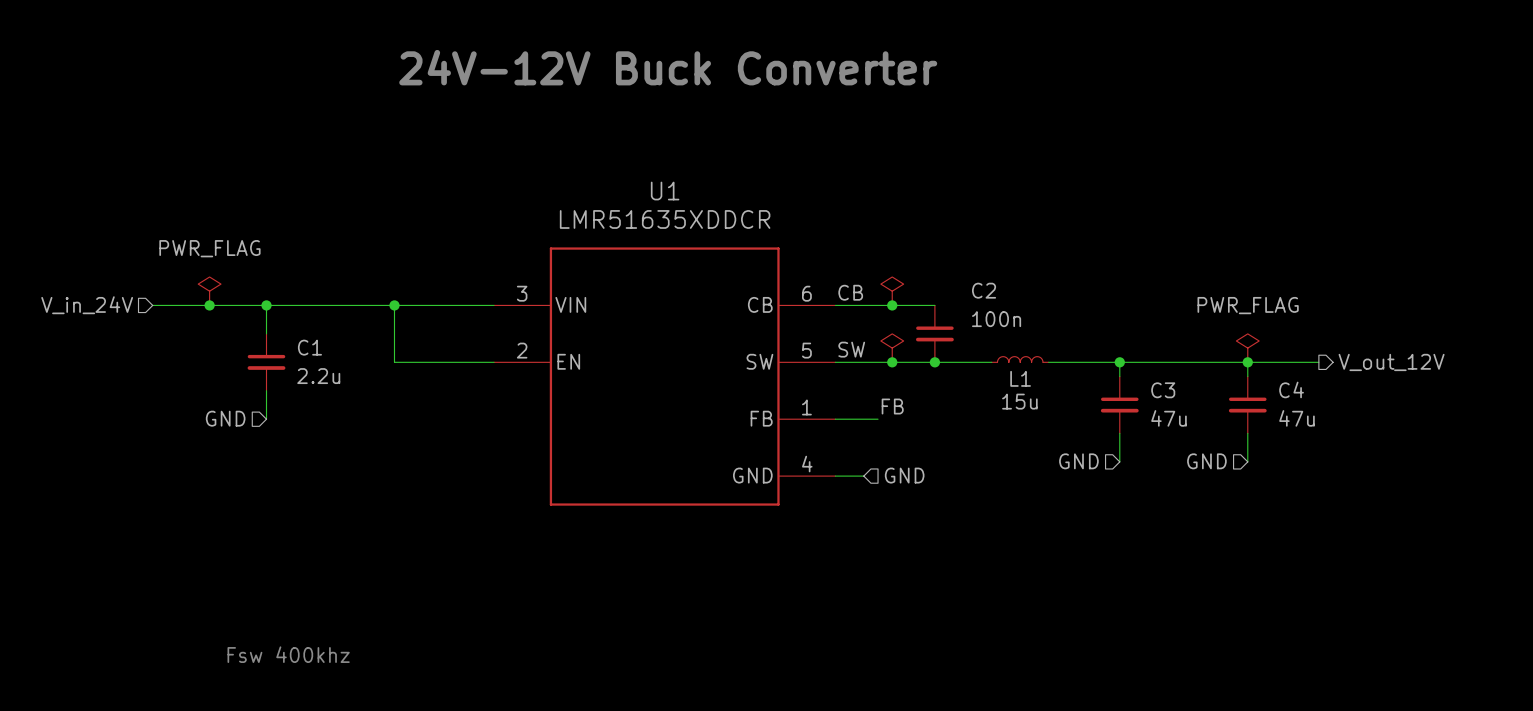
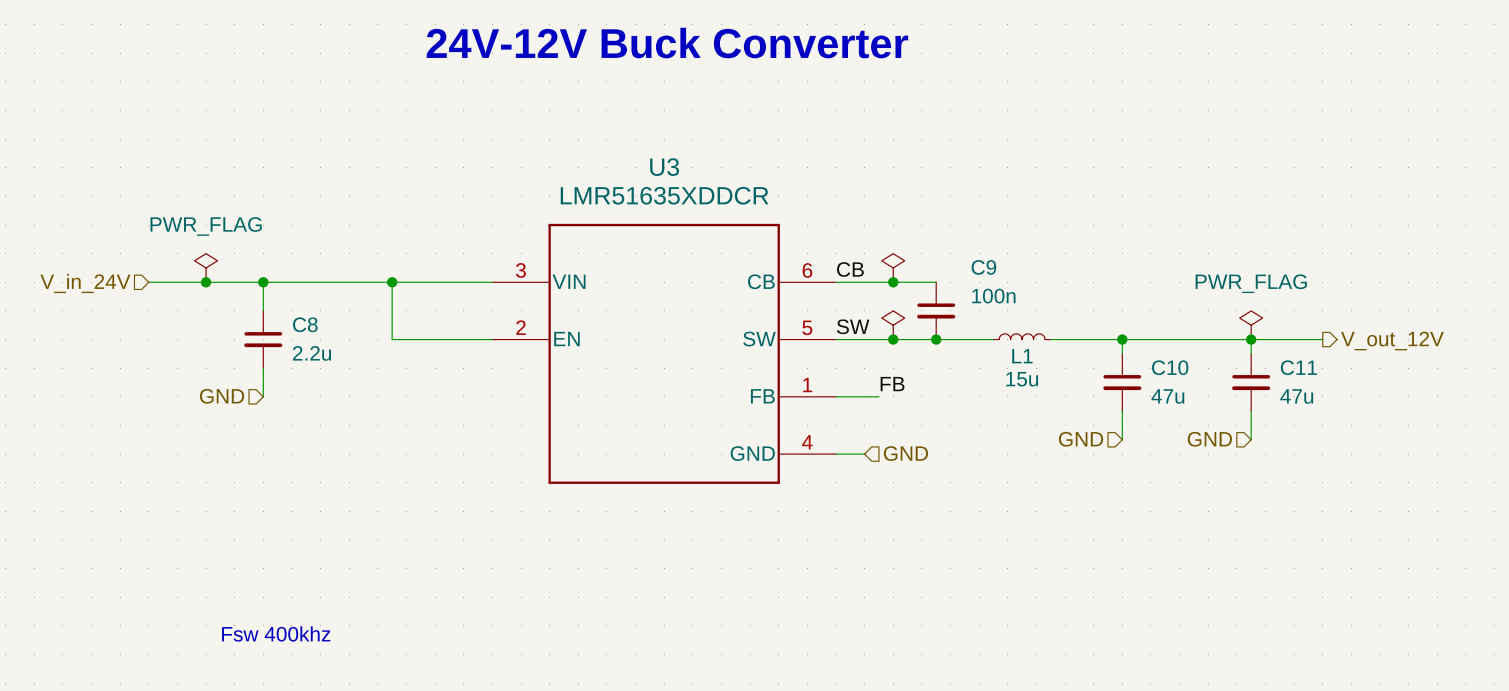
U1 name: U1 (665, 191) -> U3 (664, 167)
C2 name: C2 (984, 290) -> C9 (983, 267)
C1 name: C1 (309, 347) -> C8 (305, 324)
C4 name: C4 (1291, 389) -> C11 (1298, 367)
C3 name: C3 (1163, 390) -> C10 (1170, 367)

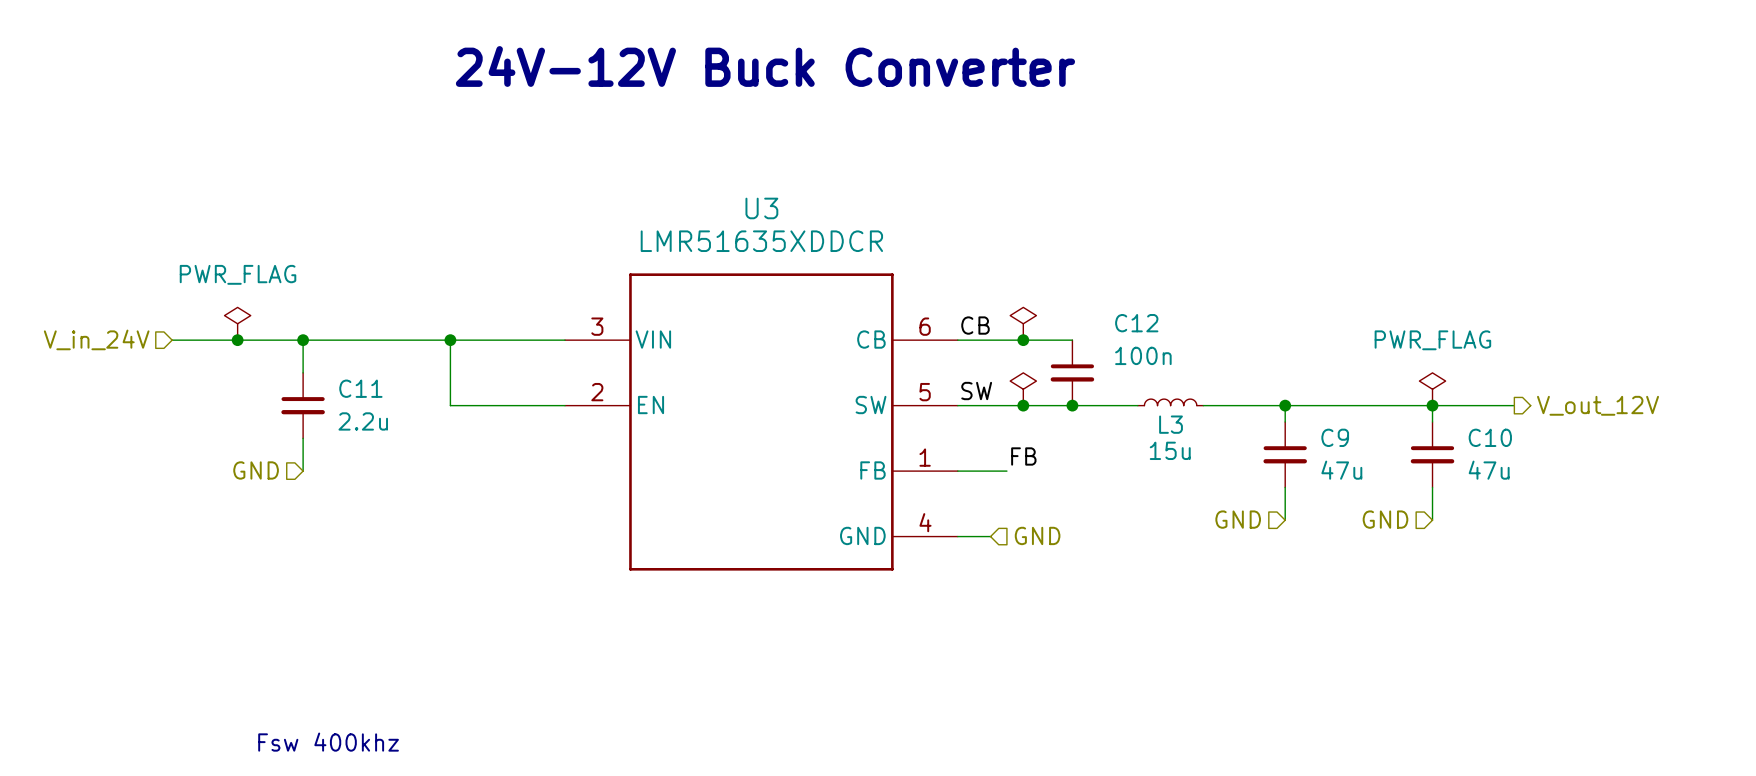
C9 name: C9 (983, 267) -> C12 (1136, 323)
C8 name: C8 (305, 324) -> C11 (360, 388)
L1 name: L1 (1022, 356) -> L3 (1171, 424)
C10 name: C10 (1170, 367) -> C9 (1335, 437)
C11 name: C11 (1298, 367) -> C10 (1490, 437)

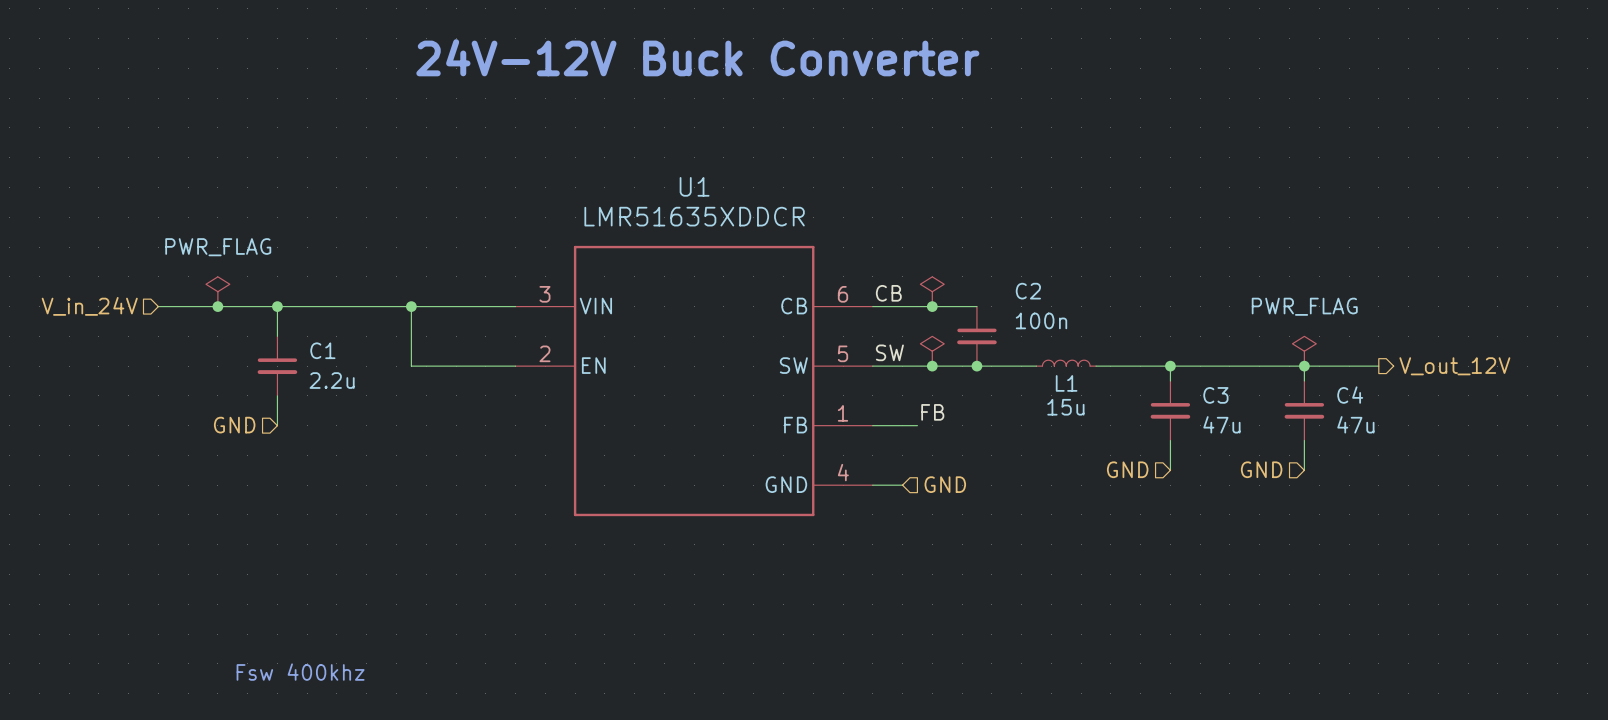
U3 name: U3 (761, 208) -> U1 (694, 186)
C12 name: C12 (1136, 323) -> C2 (1028, 291)
C11 name: C11 (360, 388) -> C1 (322, 350)
L3 name: L3 (1171, 424) -> L1 (1066, 383)
C9 name: C9 (1335, 437) -> C3 (1215, 395)
C10 name: C10 (1490, 437) -> C4 (1350, 395)

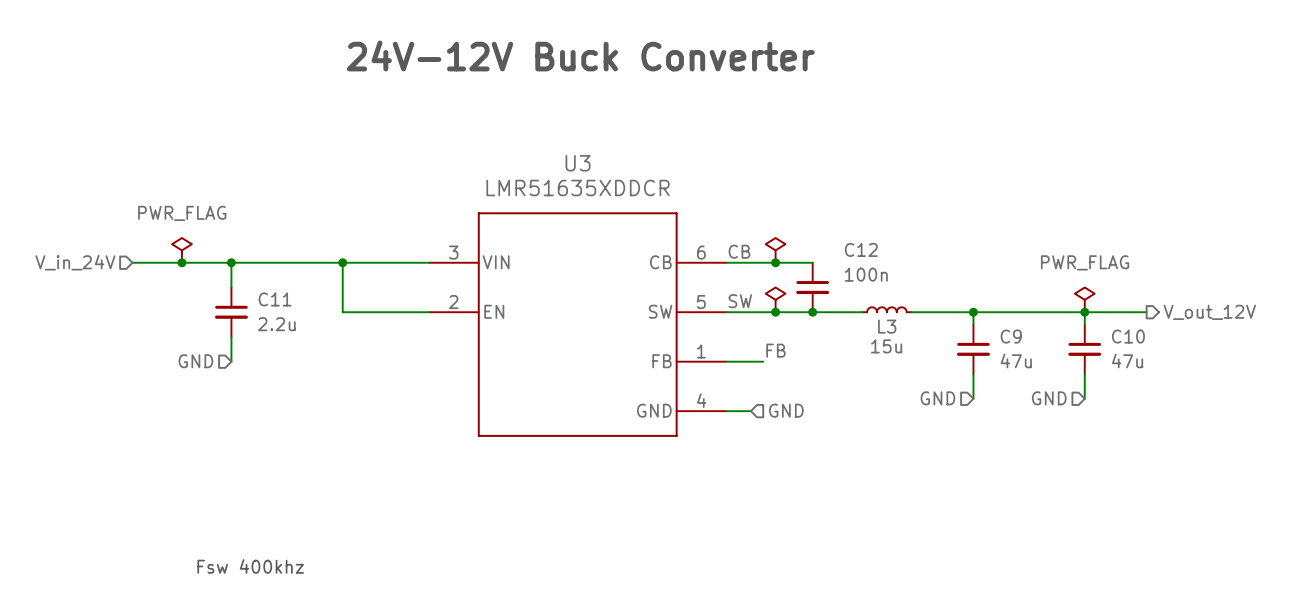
U1 name: U1 (694, 186) -> U3 (578, 163)
C2 name: C2 (1028, 291) -> C12 (861, 249)
C1 name: C1 (322, 350) -> C11 (275, 299)
L1 name: L1 (1066, 383) -> L3 (887, 326)
C3 name: C3 (1215, 395) -> C9 (1011, 336)
C4 name: C4 (1350, 395) -> C10 (1128, 336)

